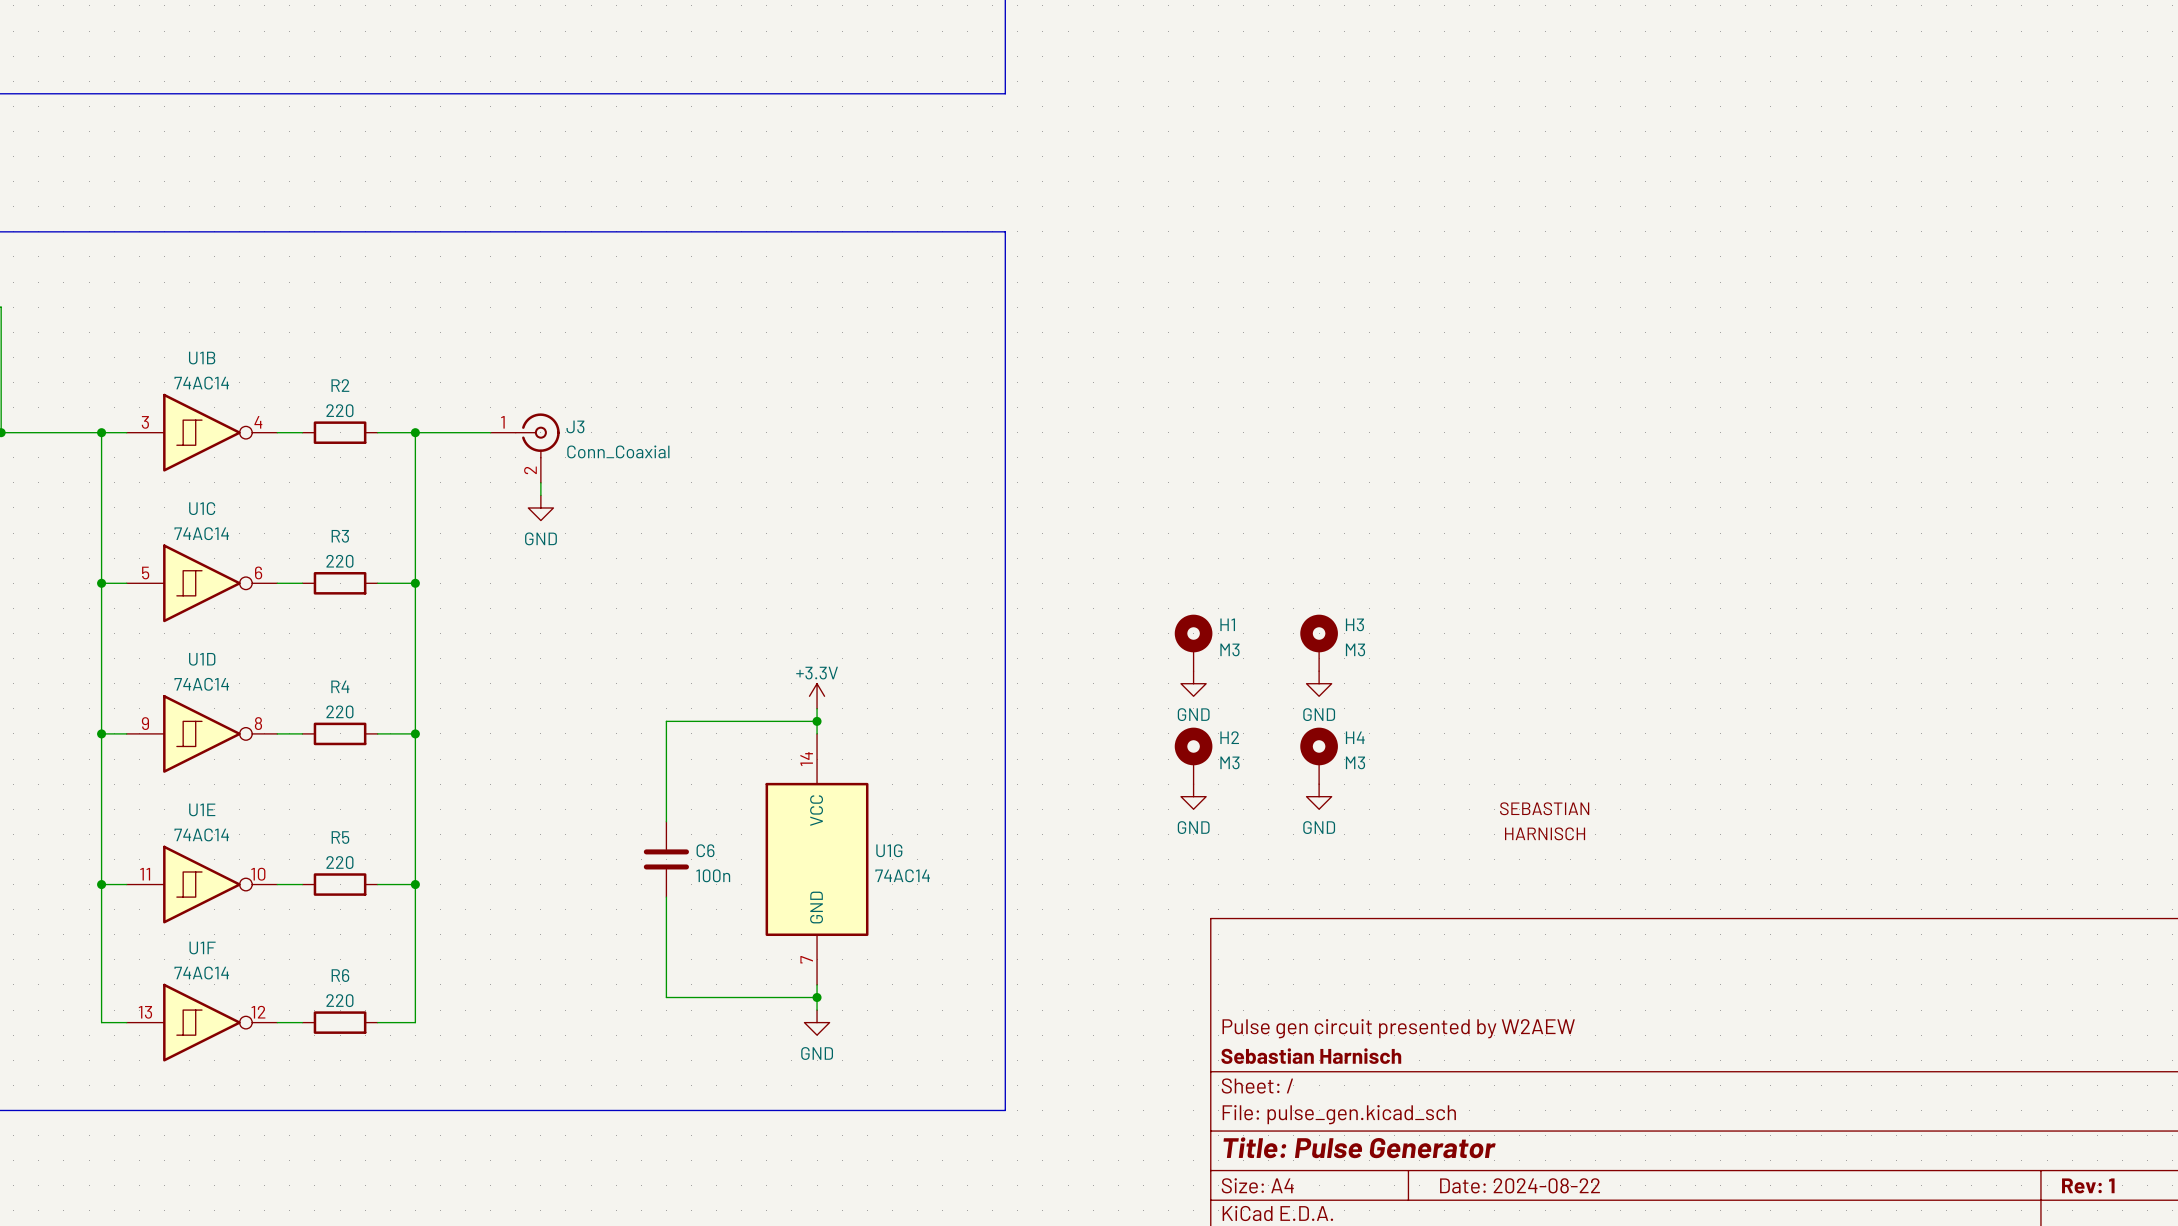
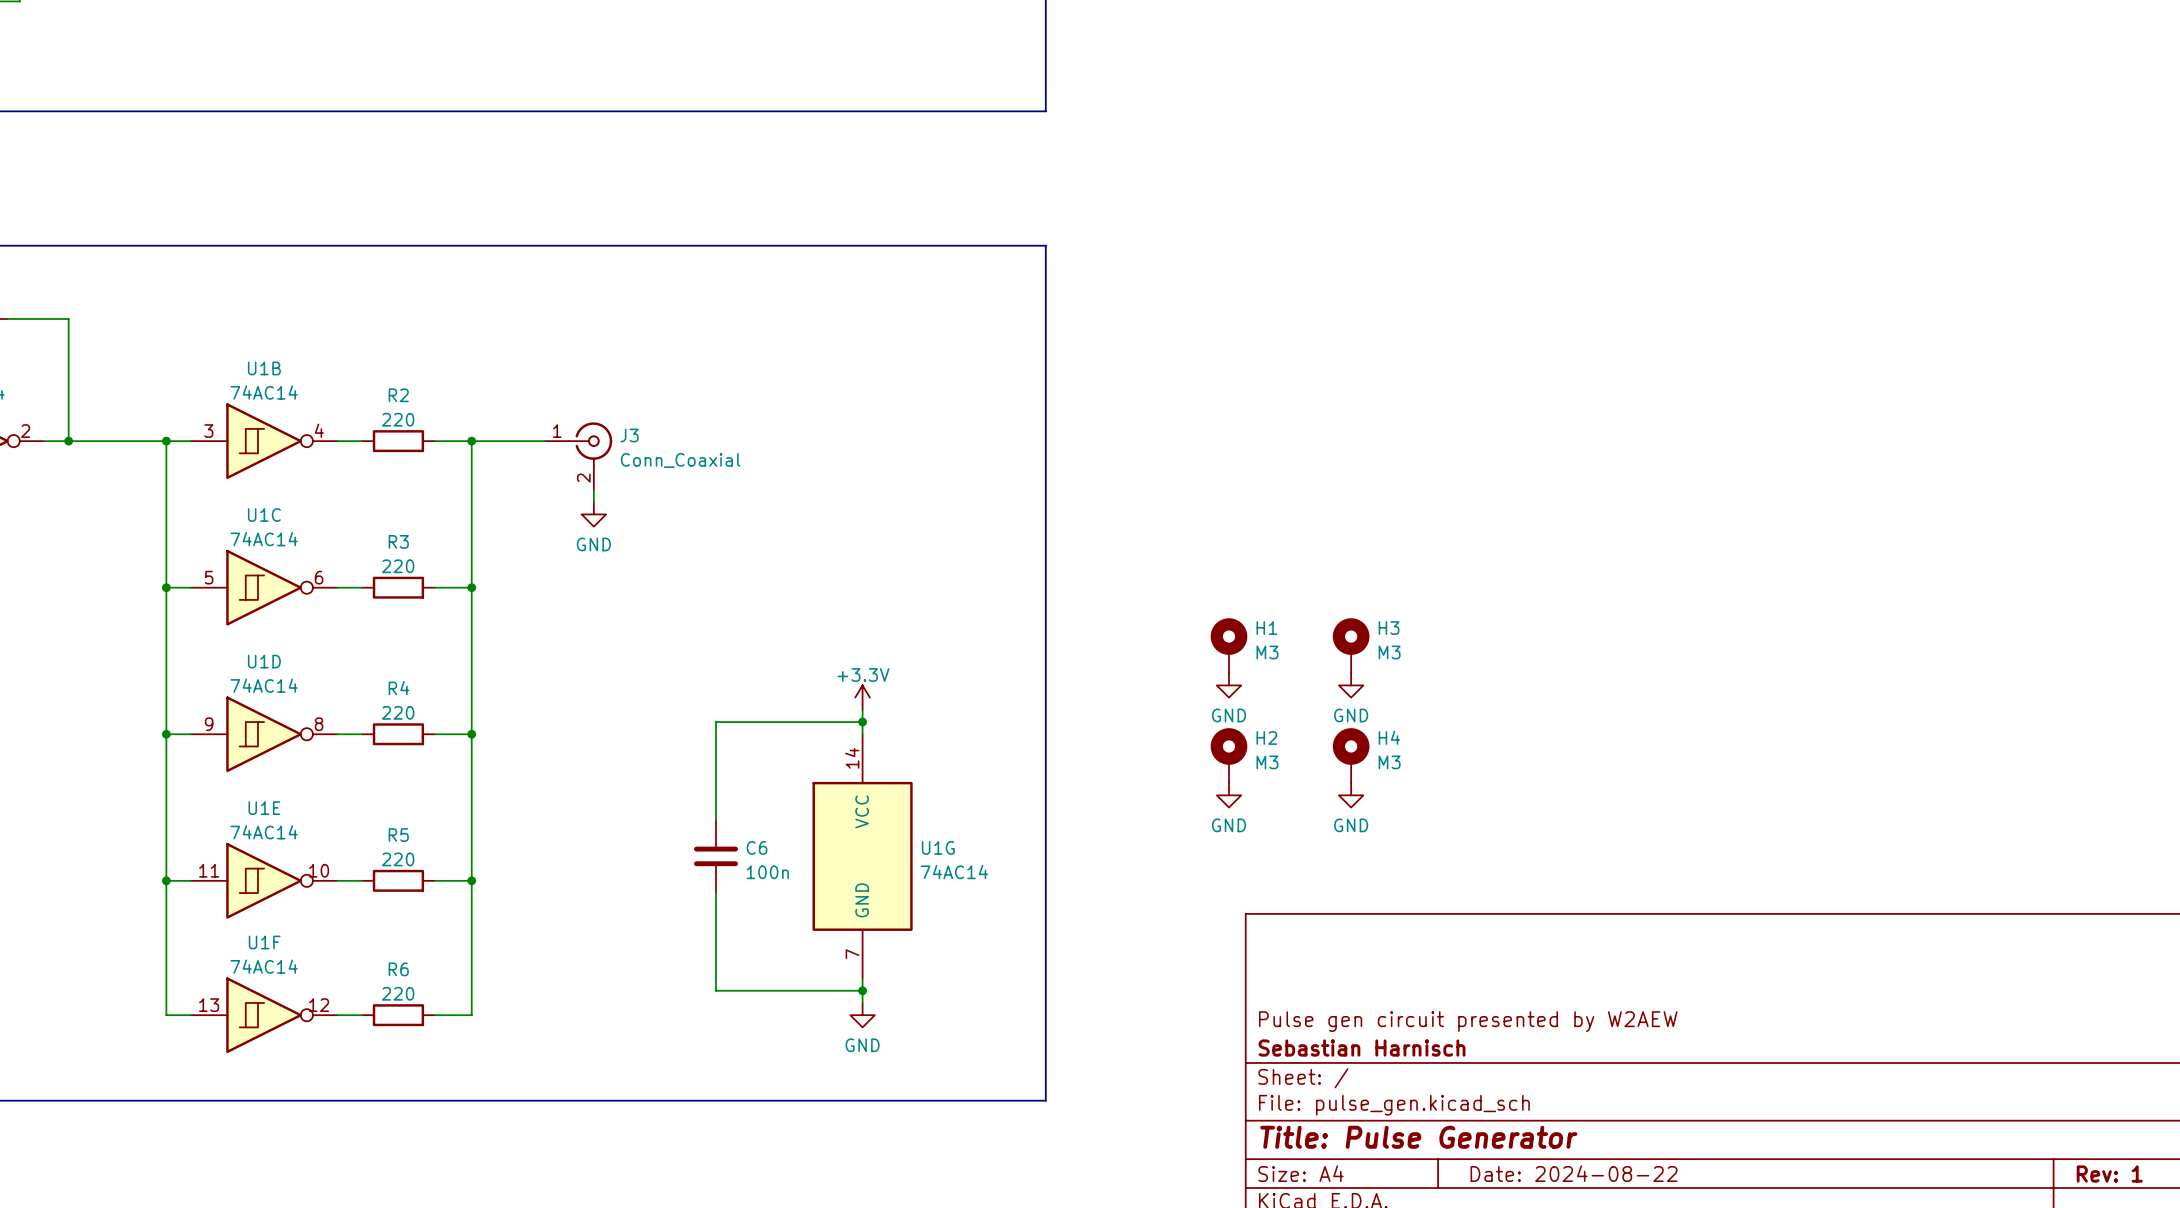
part: (1544, 821) -> none

